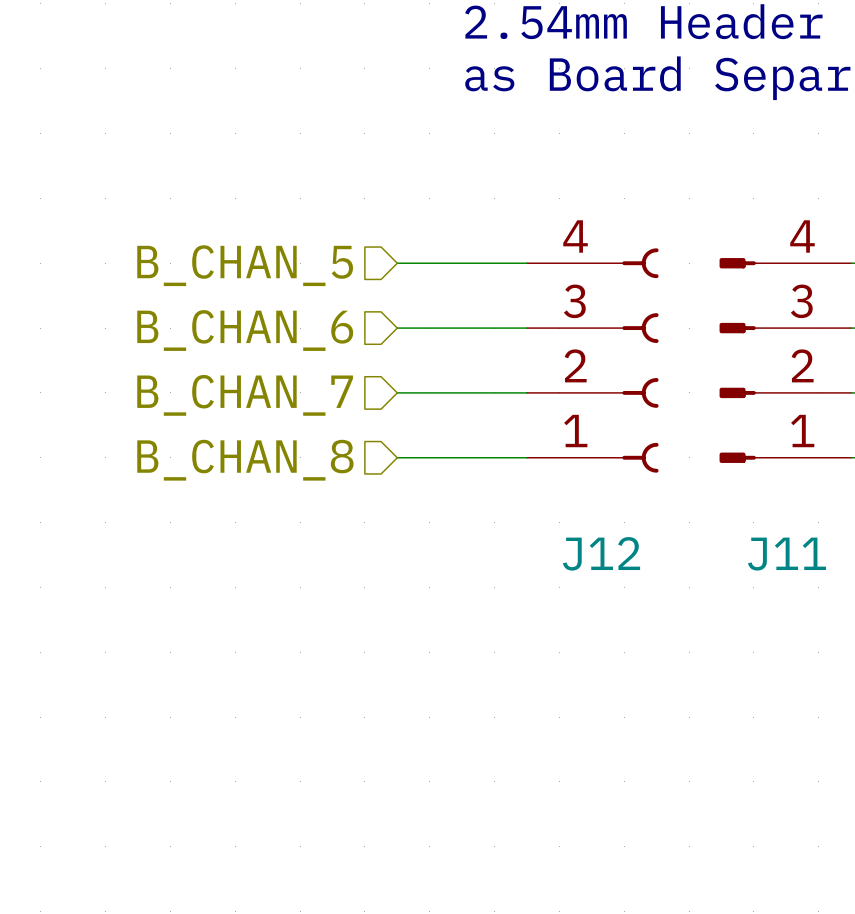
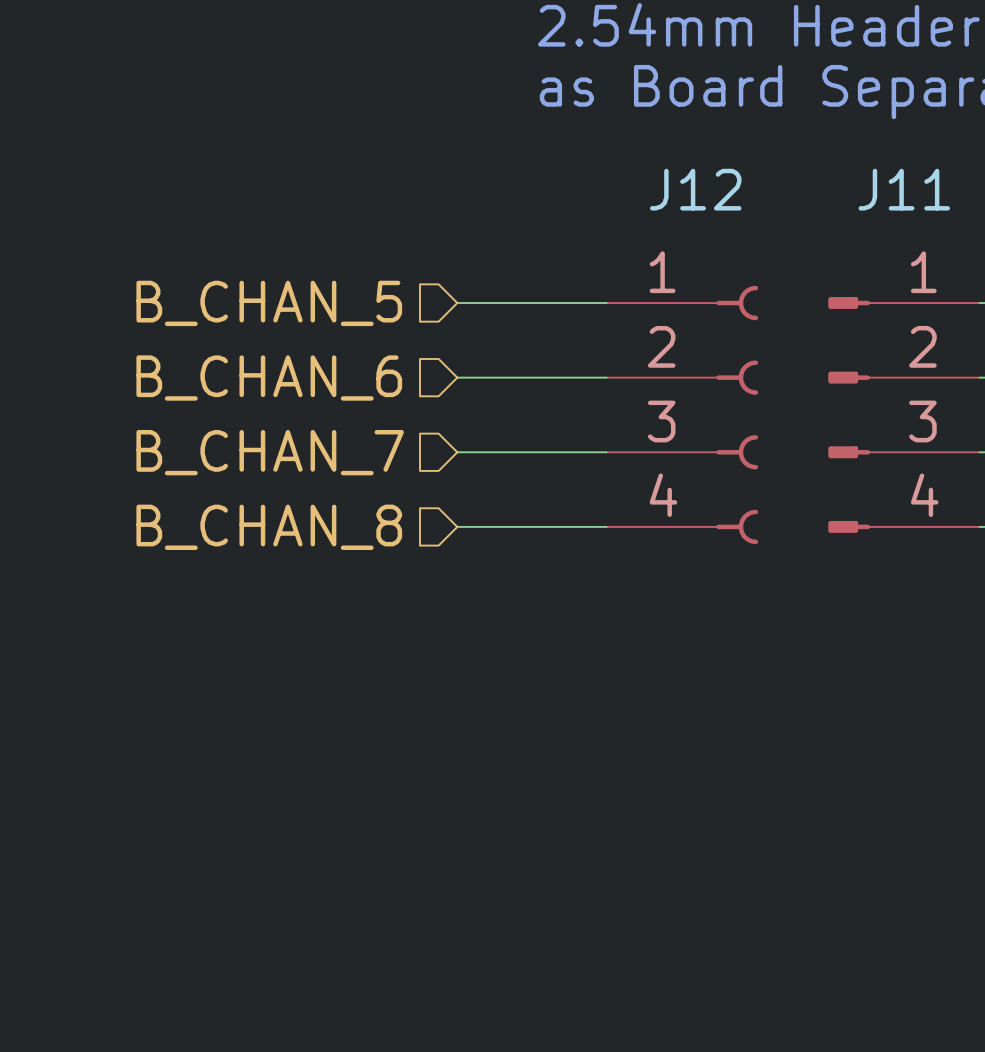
J12 flip: as is (640, 360) -> up-down (737, 414)
J11 flip: as is (737, 360) -> up-down (849, 414)

